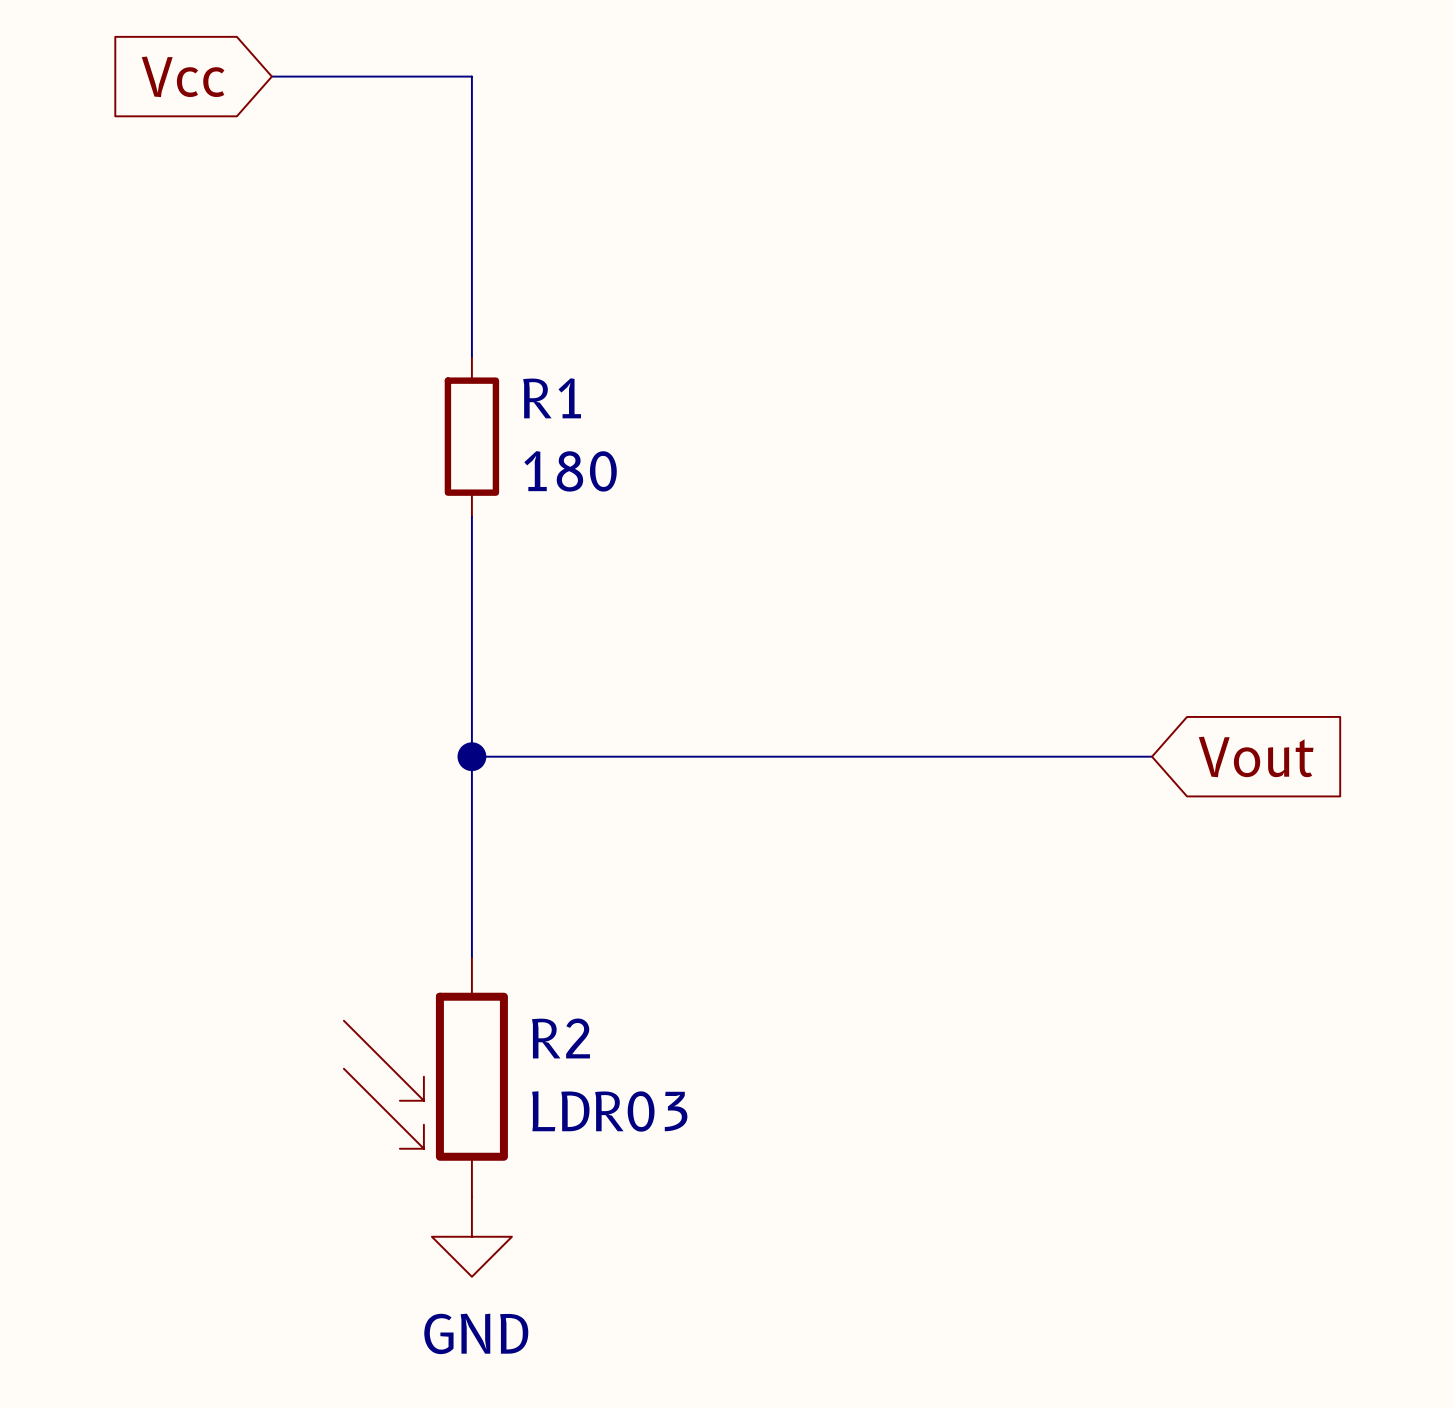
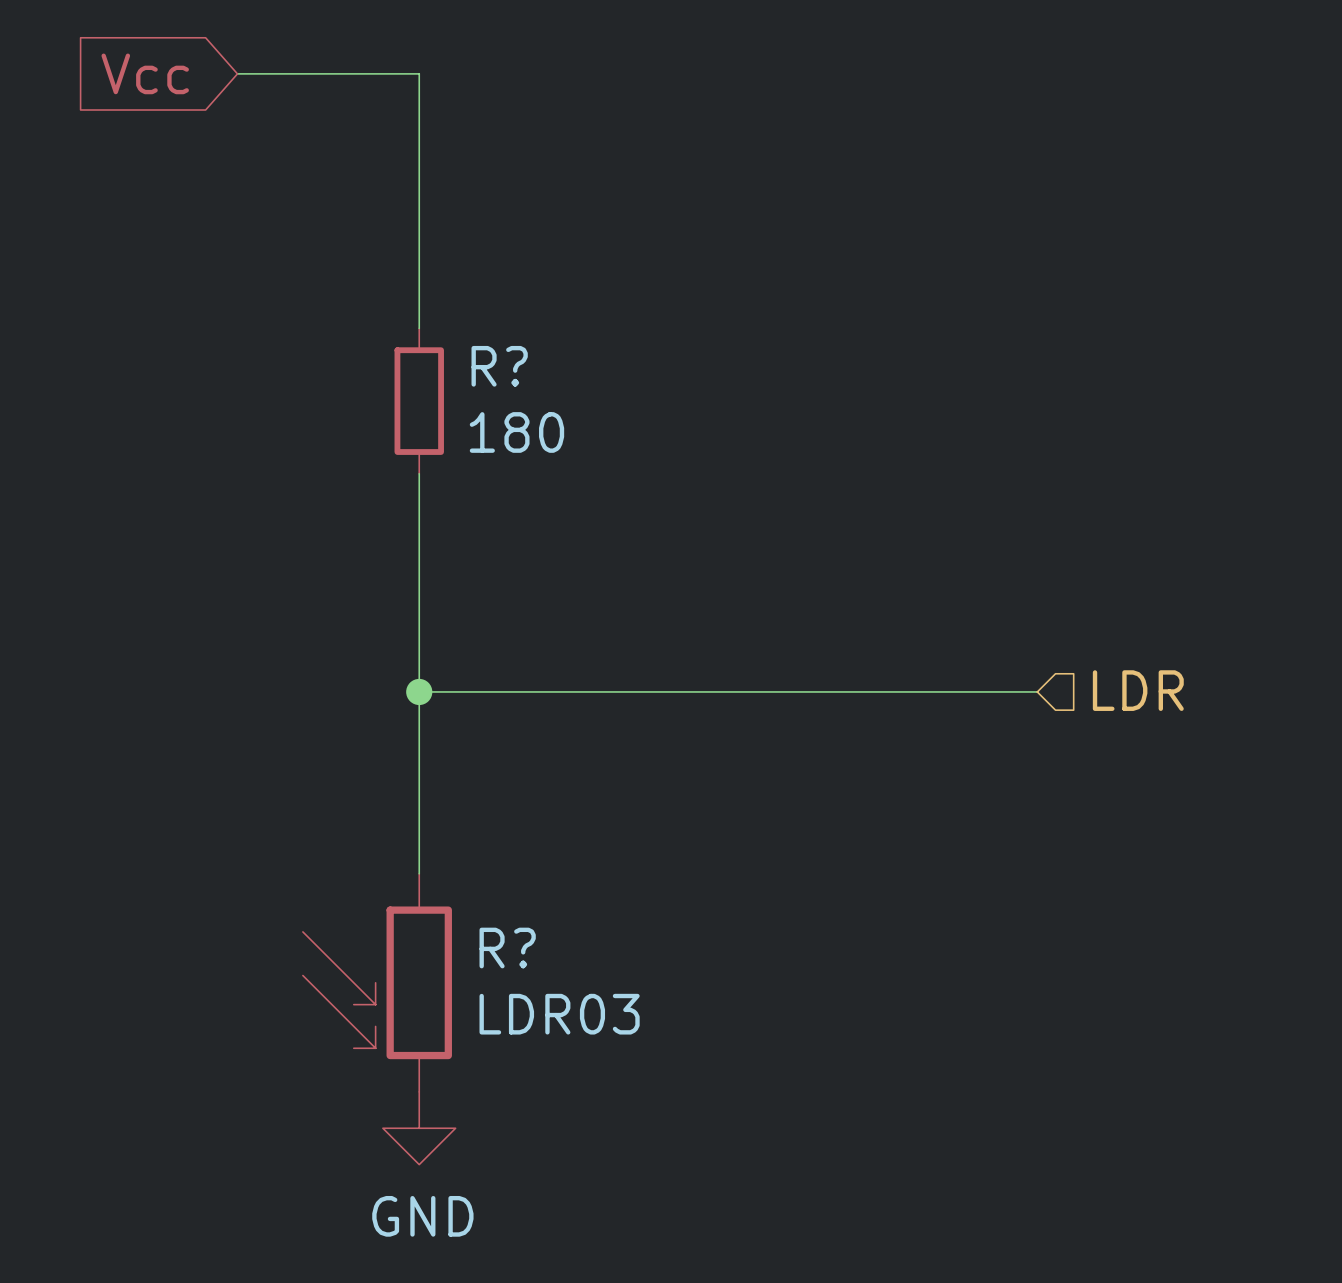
R1 name: R1 (552, 398) -> R? (499, 366)
hierarchical label: none -> LDR (1138, 690)
global label: Vout (1256, 756) -> none
R2 name: R2 (560, 1038) -> R? (507, 948)

